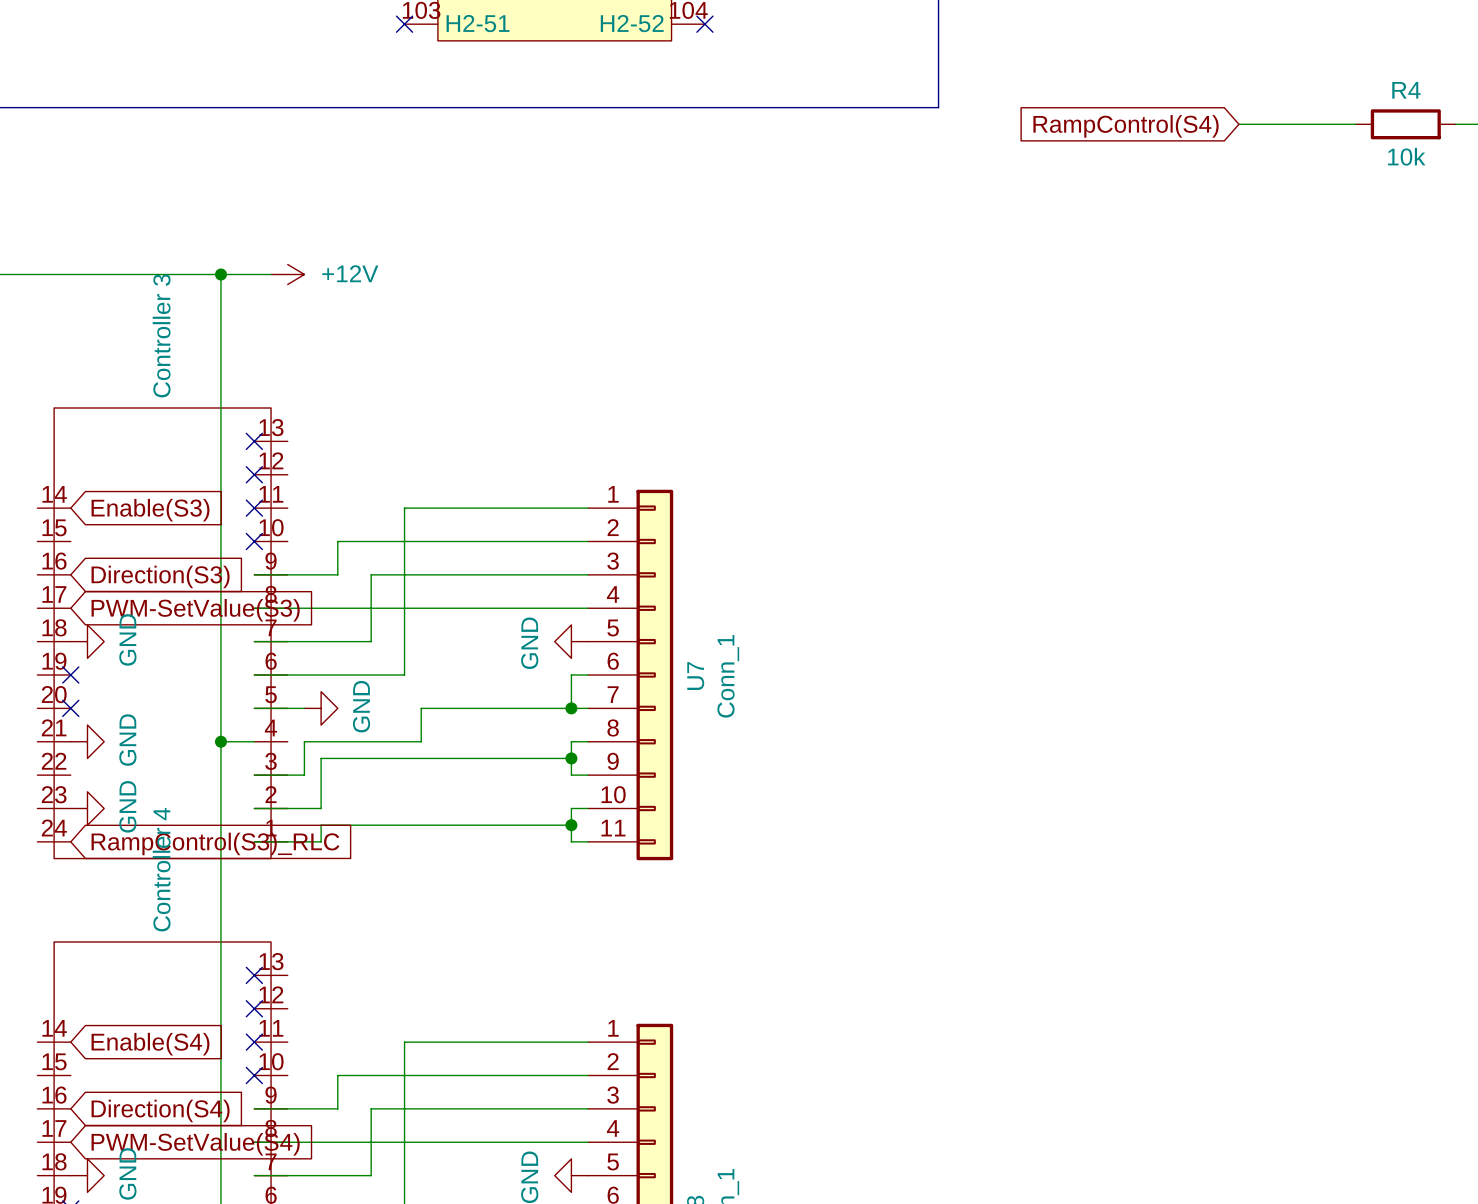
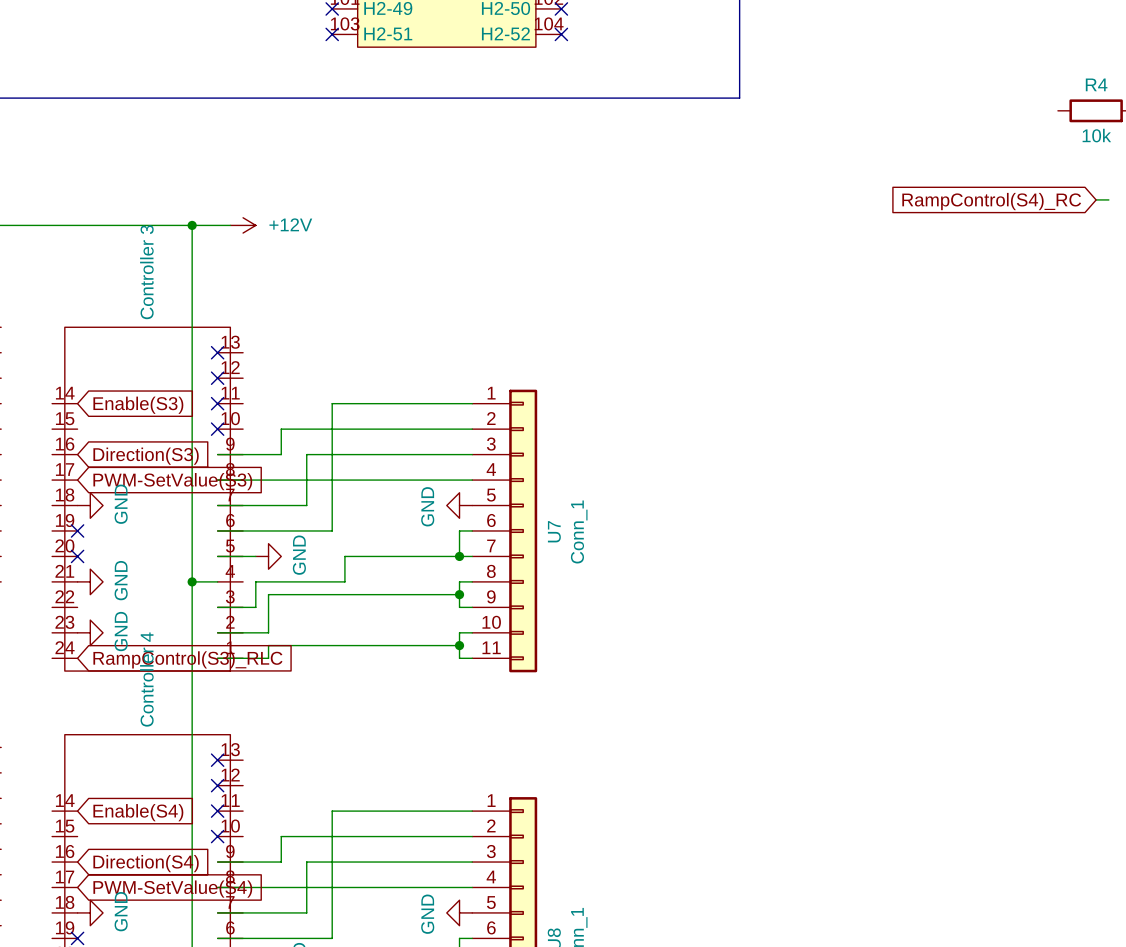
wire: (1238, 124) (1355, 124) -> none
global label: RampControl(S4) (1126, 126) -> none
wire: none -> (1096, 199) (1108, 199)
global label: none -> RampControl(S4)_RC (991, 201)

